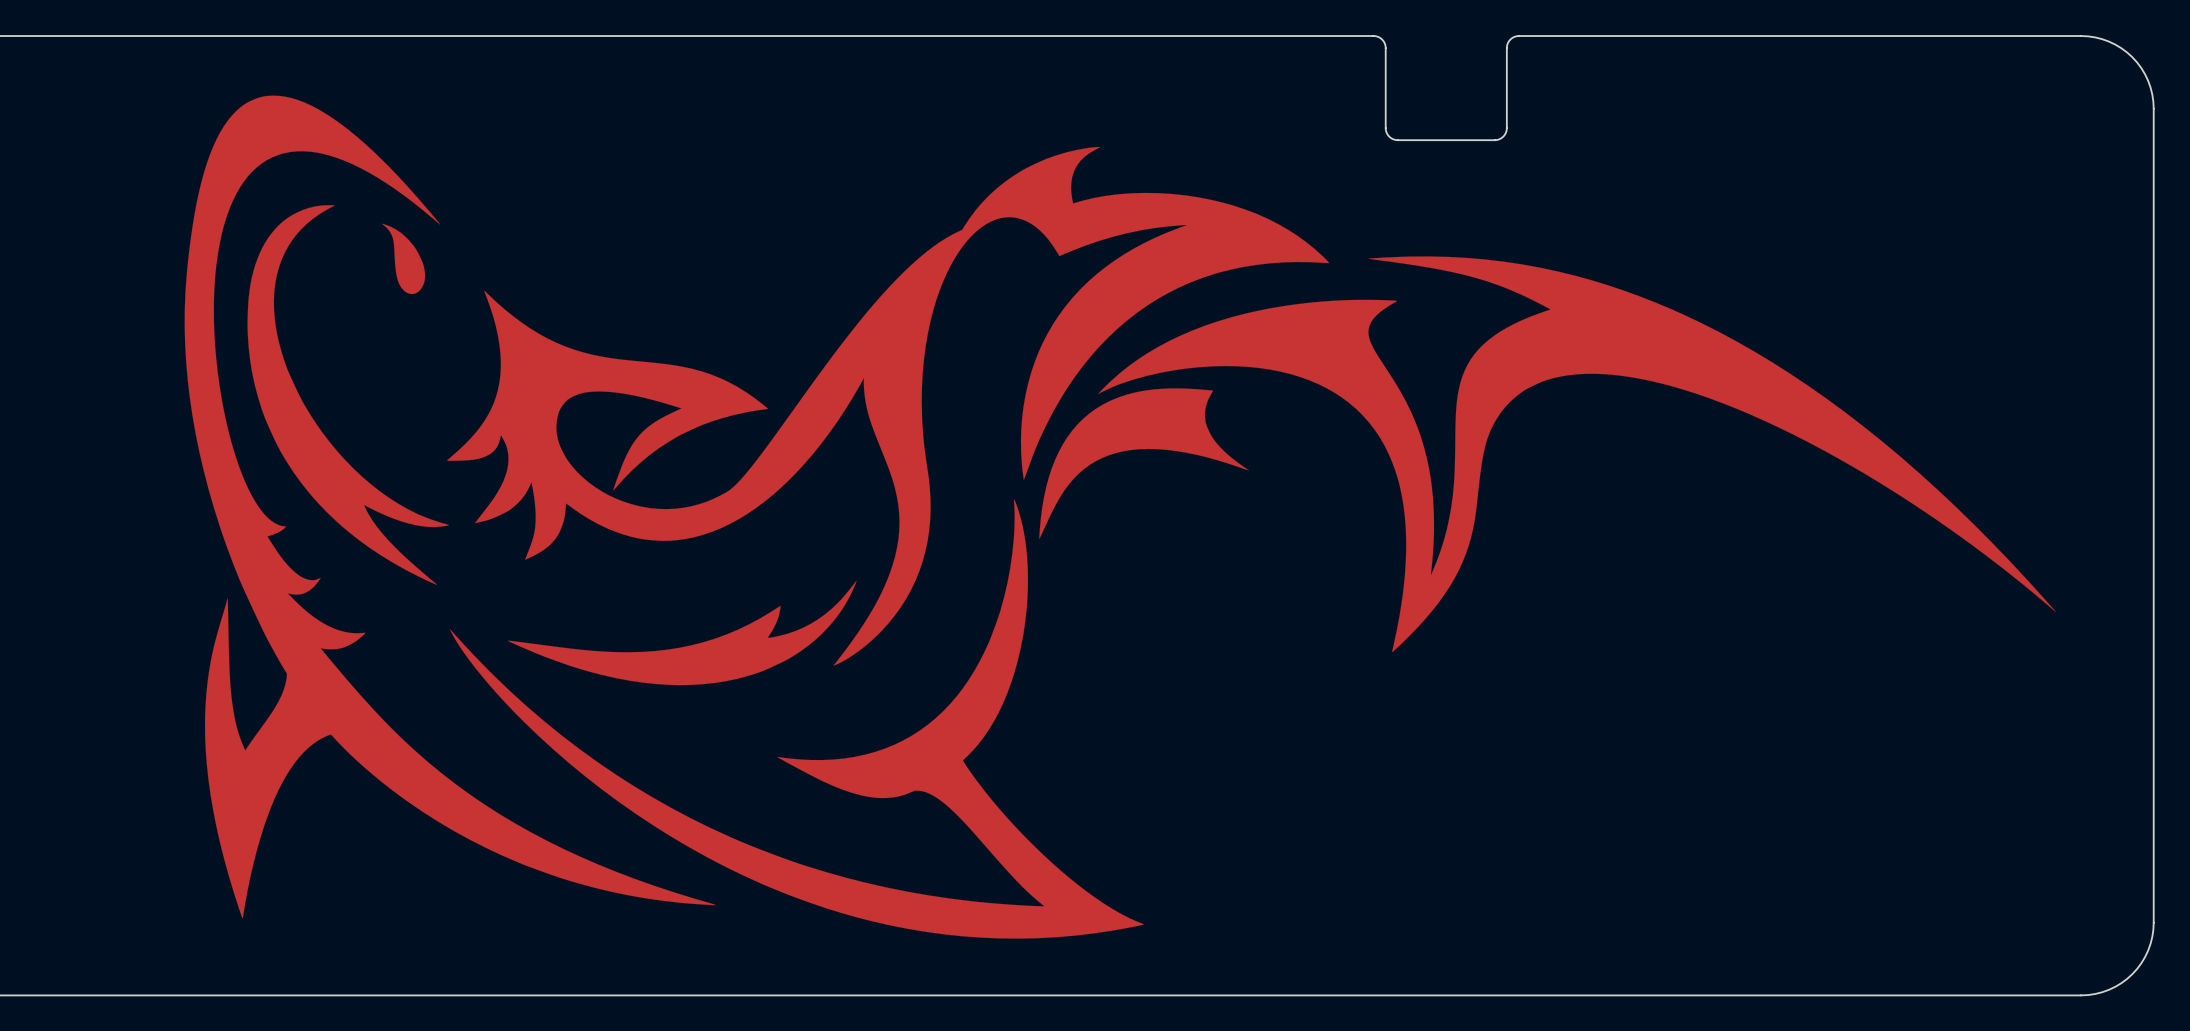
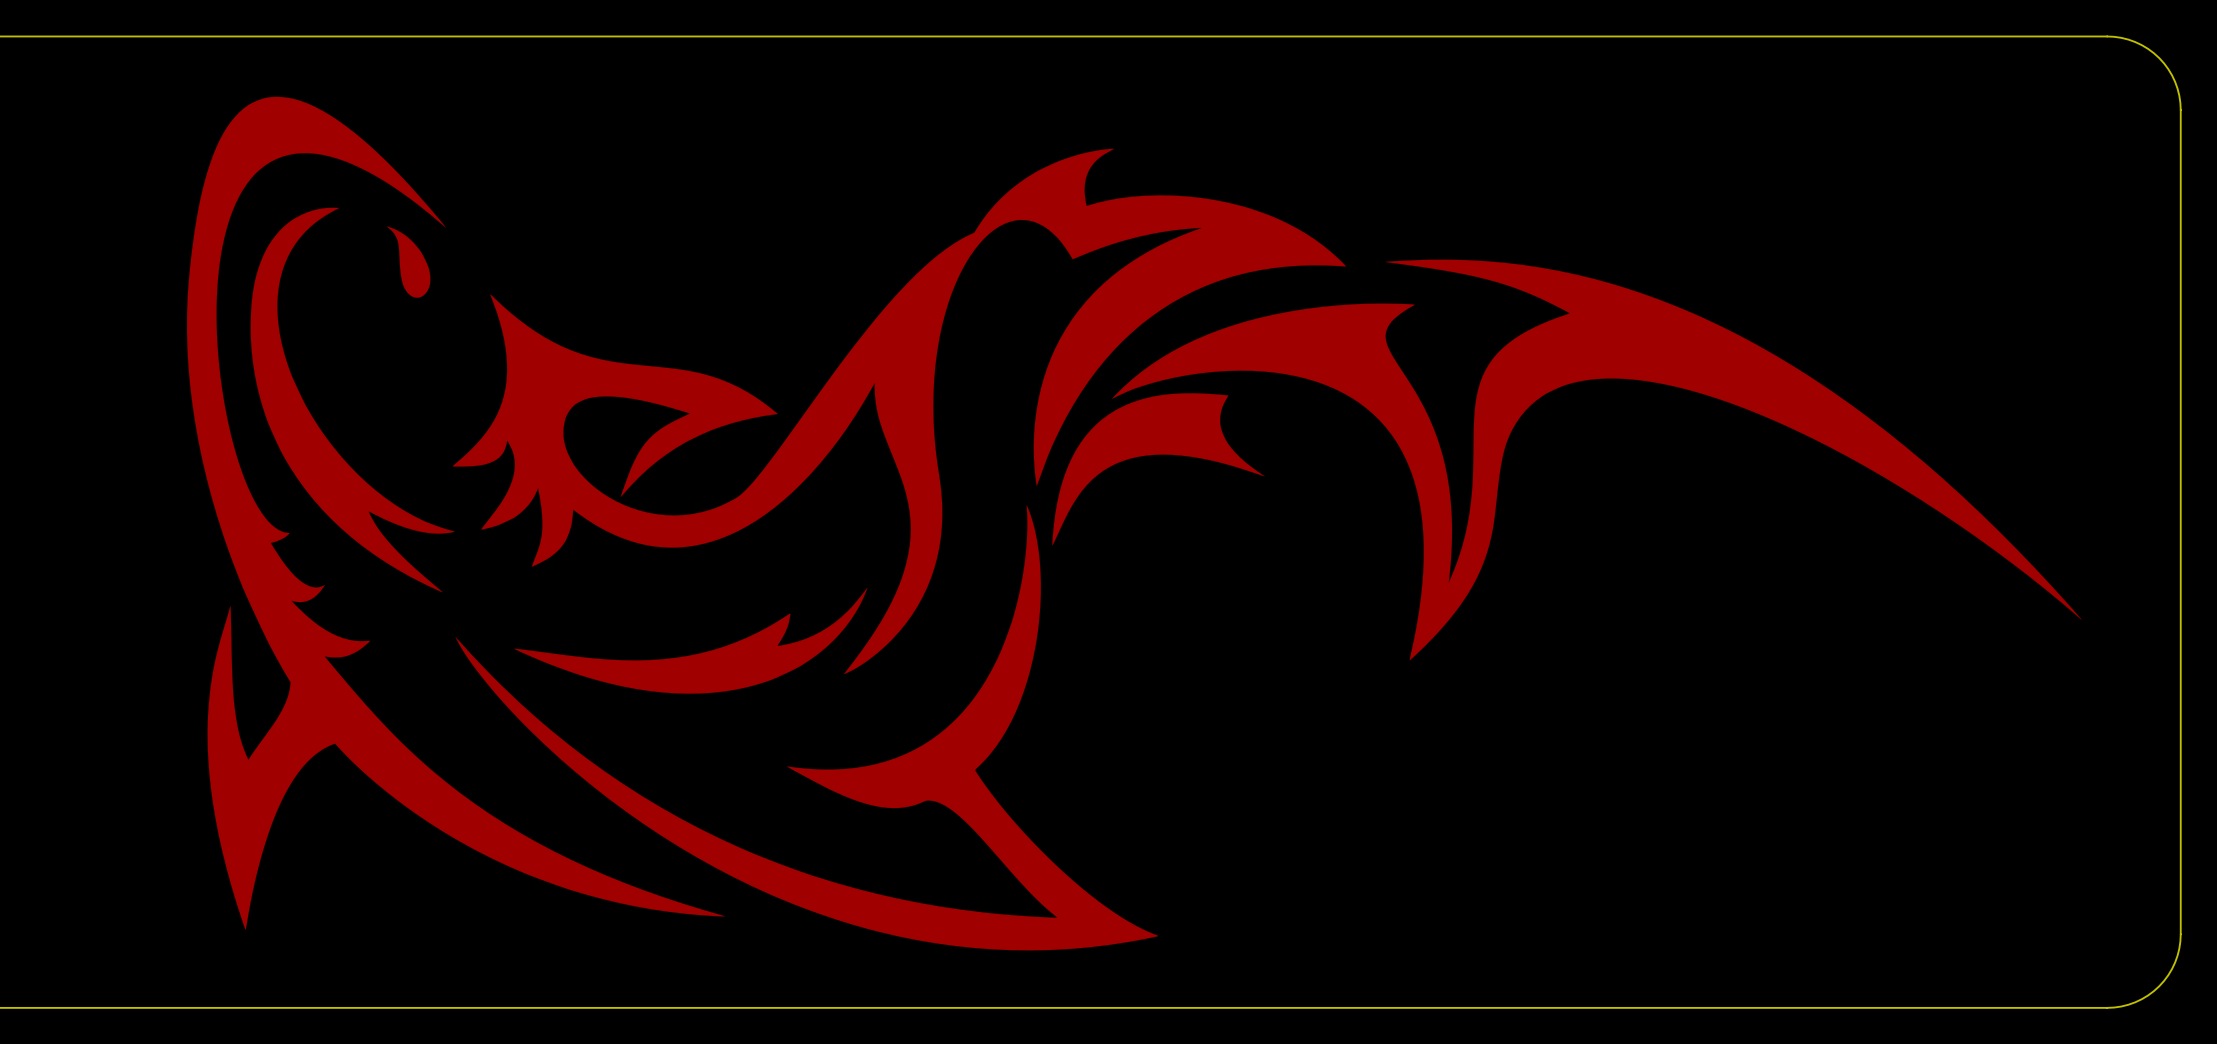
board edge: (1373, 36) (1382, 39) (1385, 46) (1386, 131) (1390, 137) (1397, 140) (1494, 140) (1502, 137) (1506, 128) (1506, 46) (1510, 39) (1518, 36) -> (1390, 36) (1538, 36)

